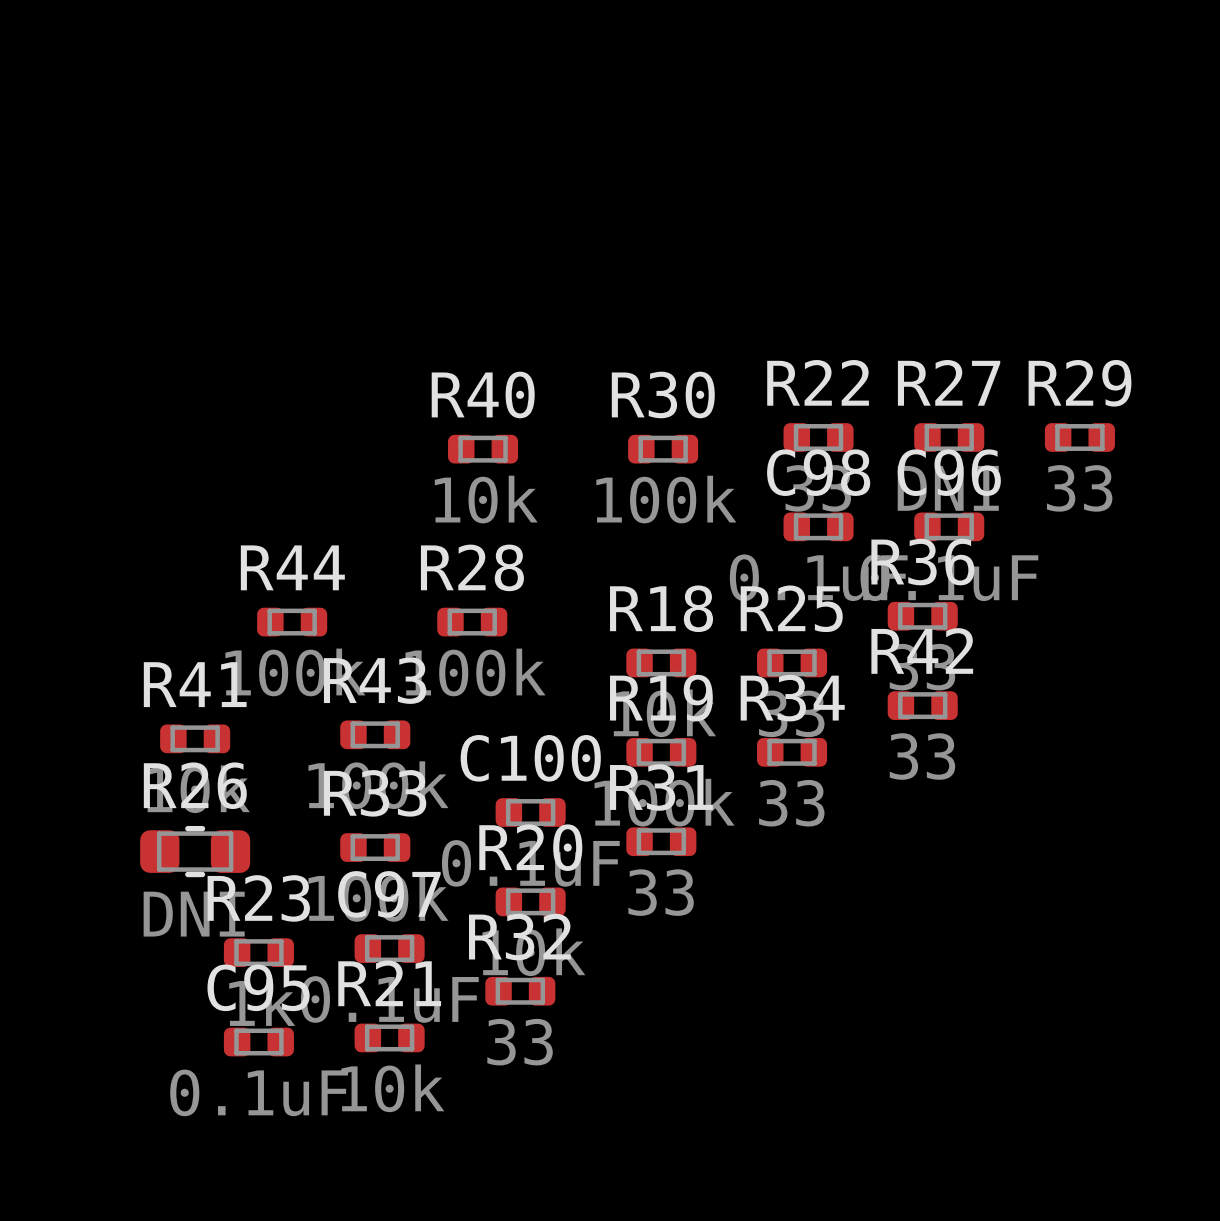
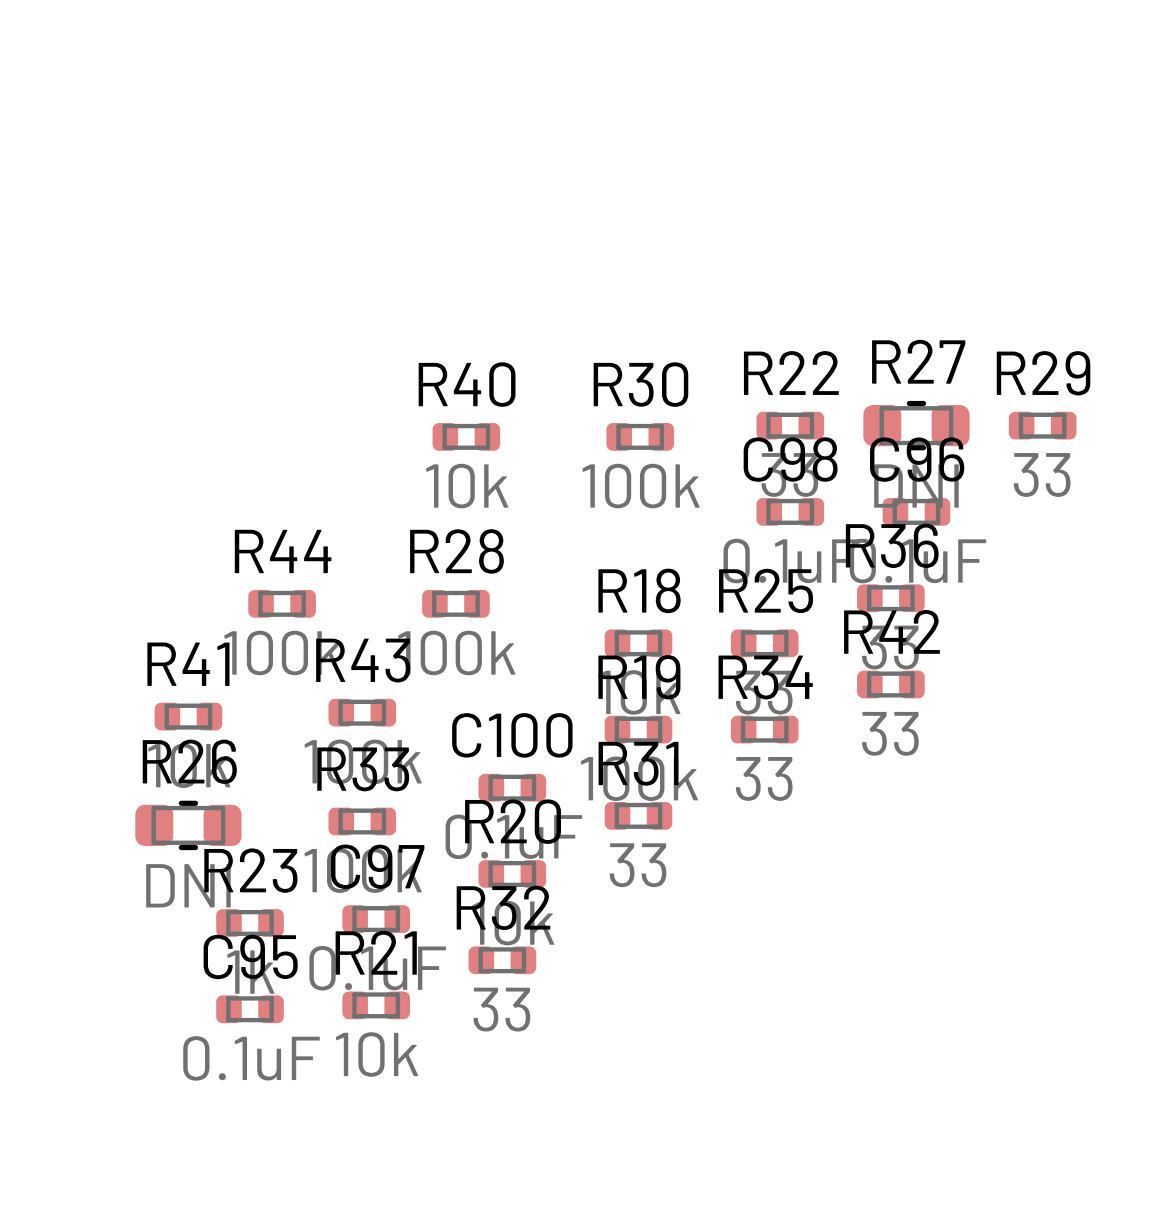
R27 footprint: [914, 423, 985, 452] -> [863, 400, 970, 451]

